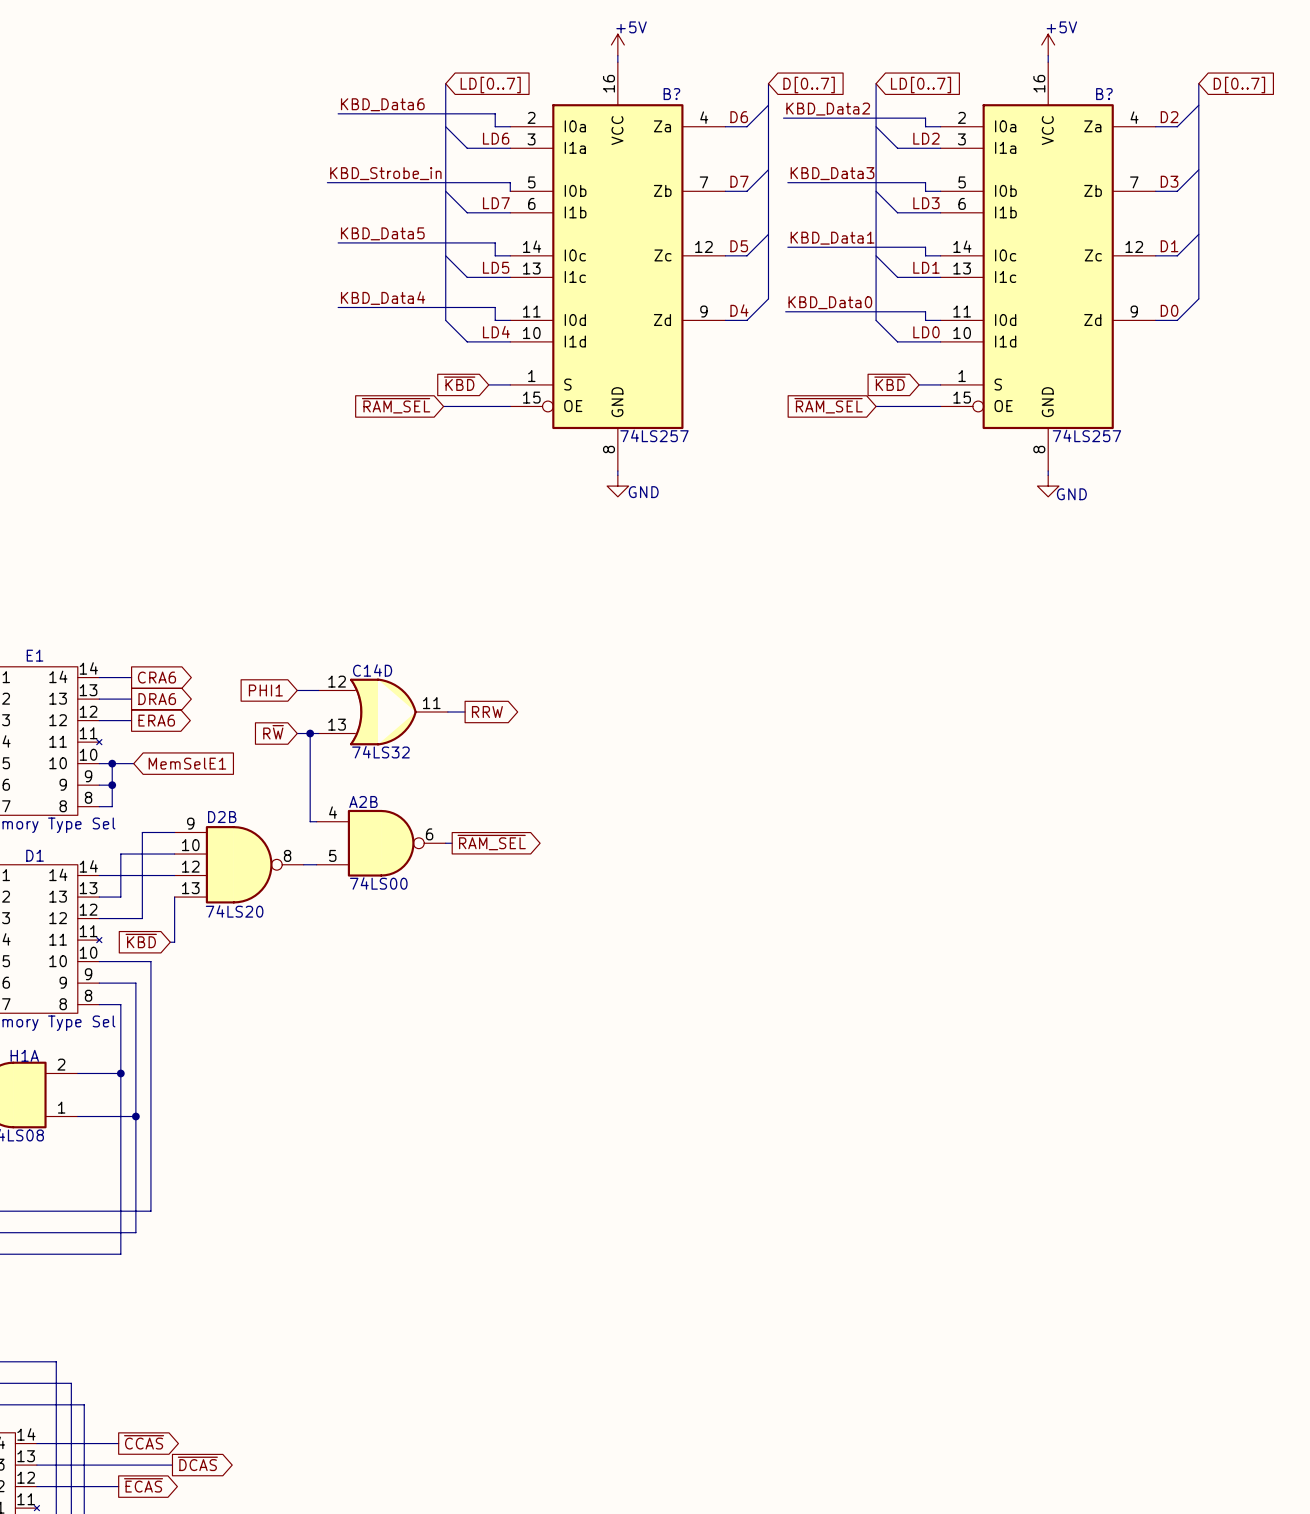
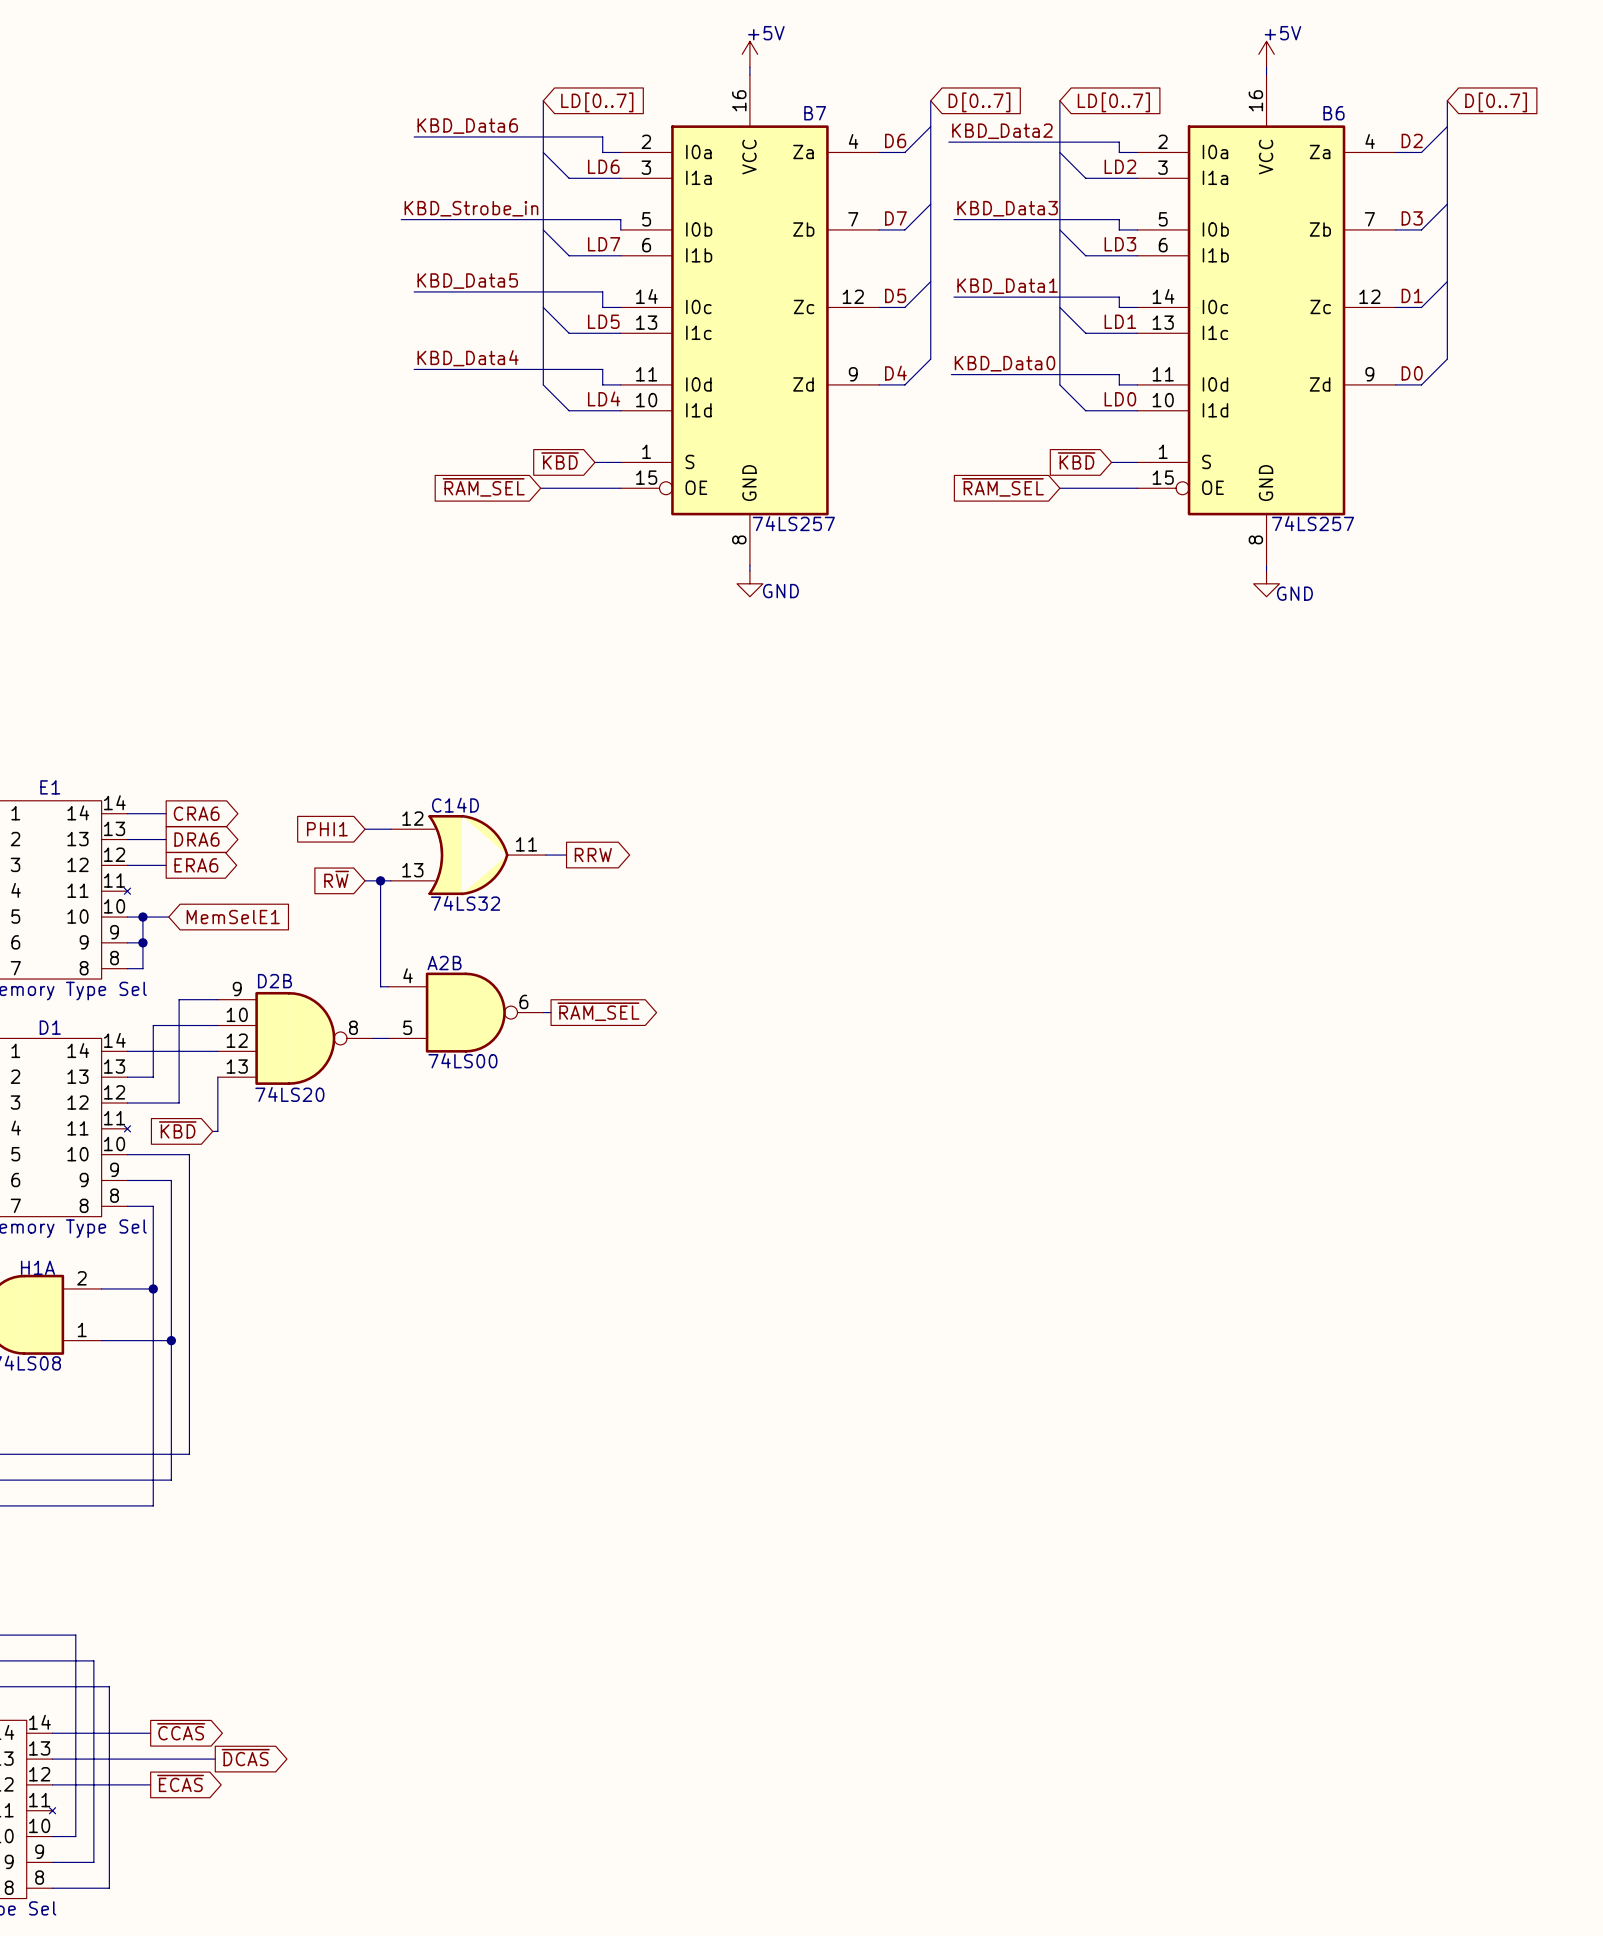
B? name: B? (671, 94) -> B7 (815, 113)
B? name: B? (1104, 94) -> B6 (1334, 113)

